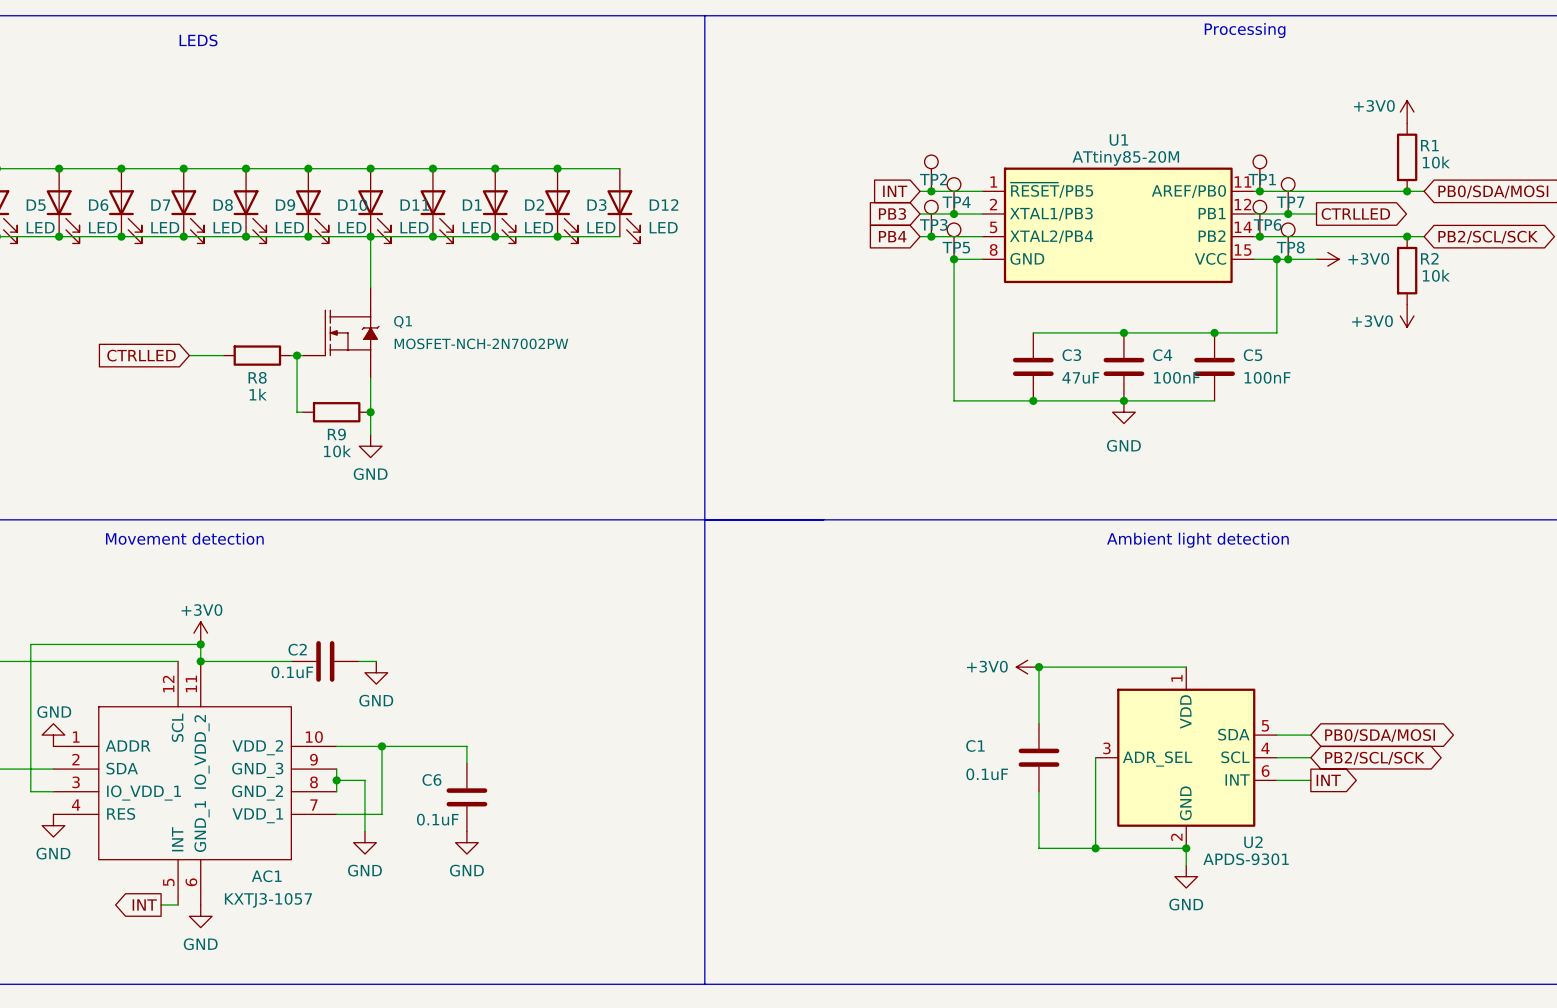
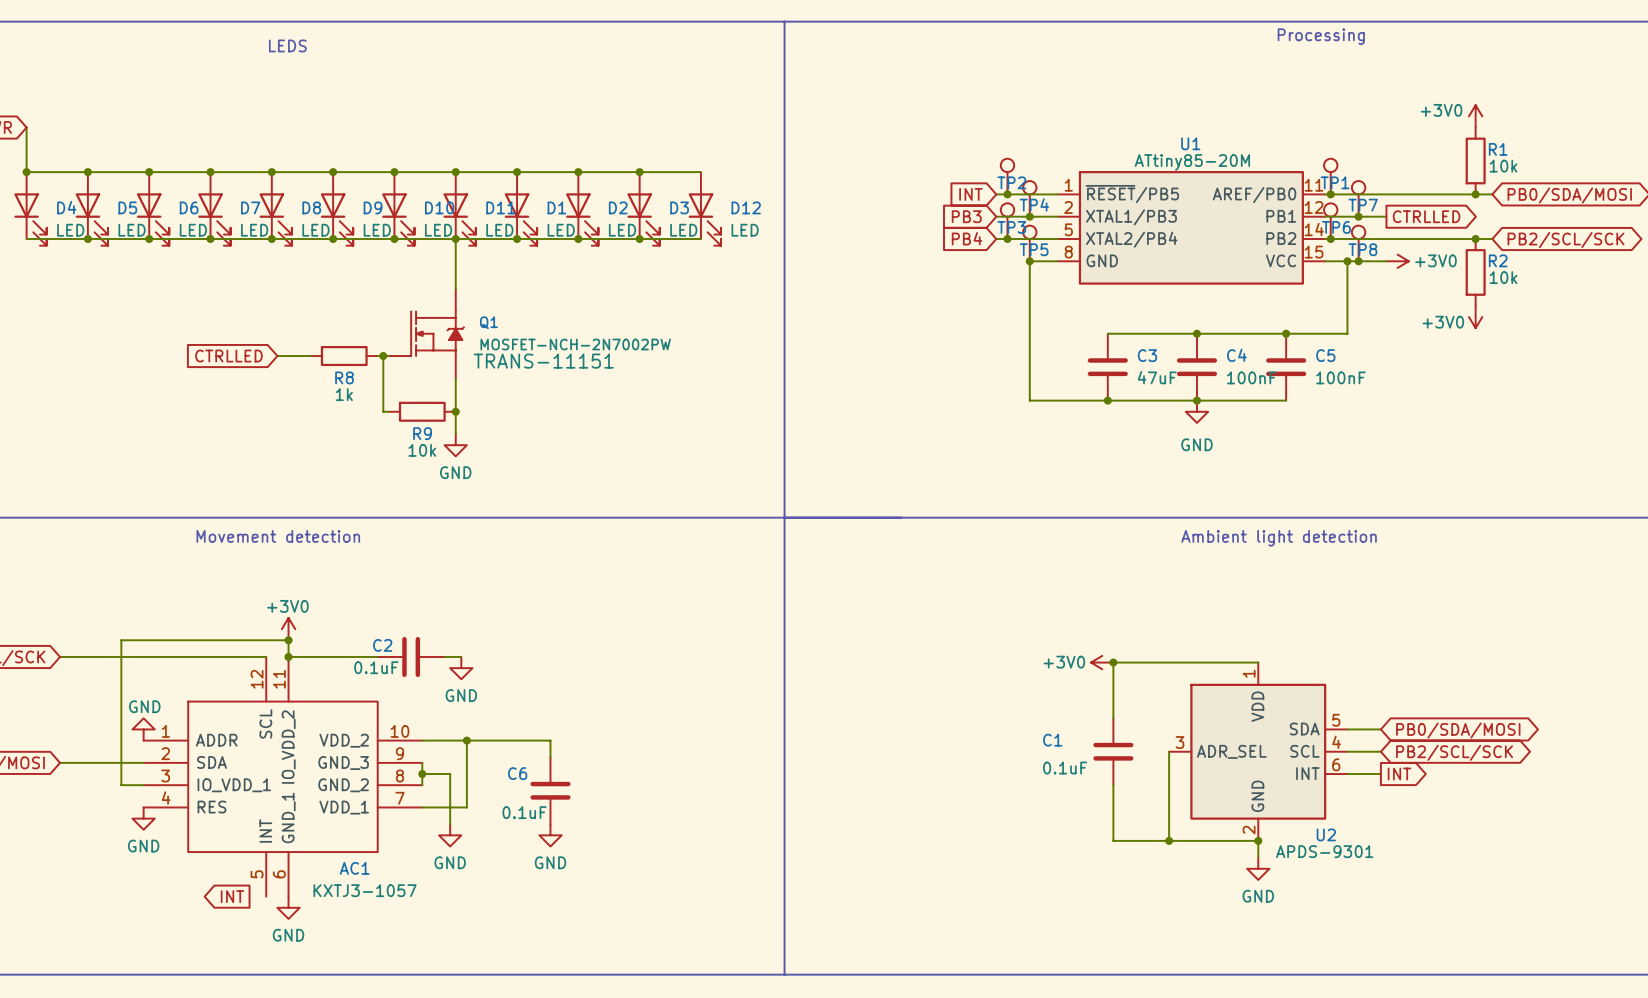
Q1 text: none -> TRANS-11151 (543, 361)
wire: (161, 904) (178, 904) -> none

